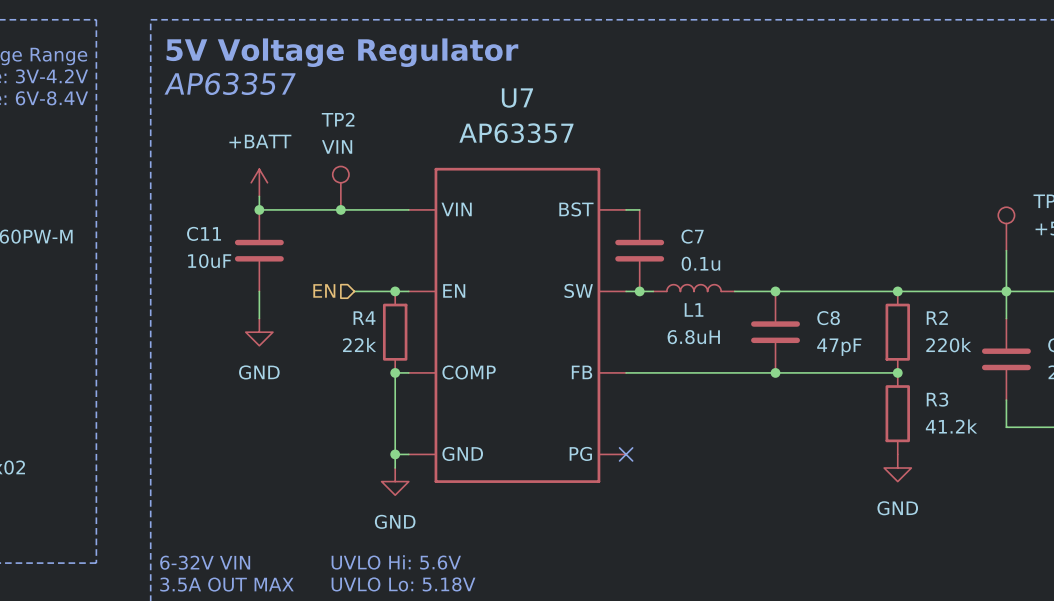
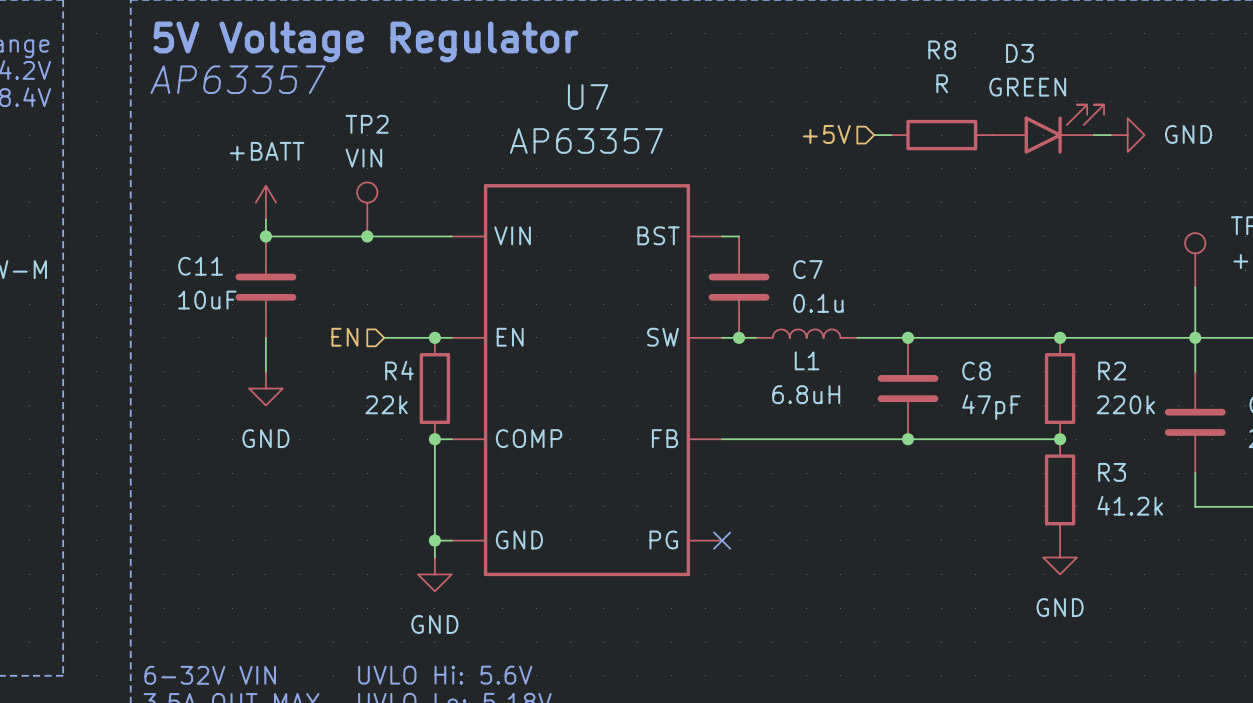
D3: none -> (1048, 129)
hierarchical label: none -> +5V (826, 134)
wire: none -> (874, 135) (891, 135)
R8: none -> R (941, 135)
wire: none -> (1093, 135) (1110, 135)
power symbol: none -> GND (1127, 135)

